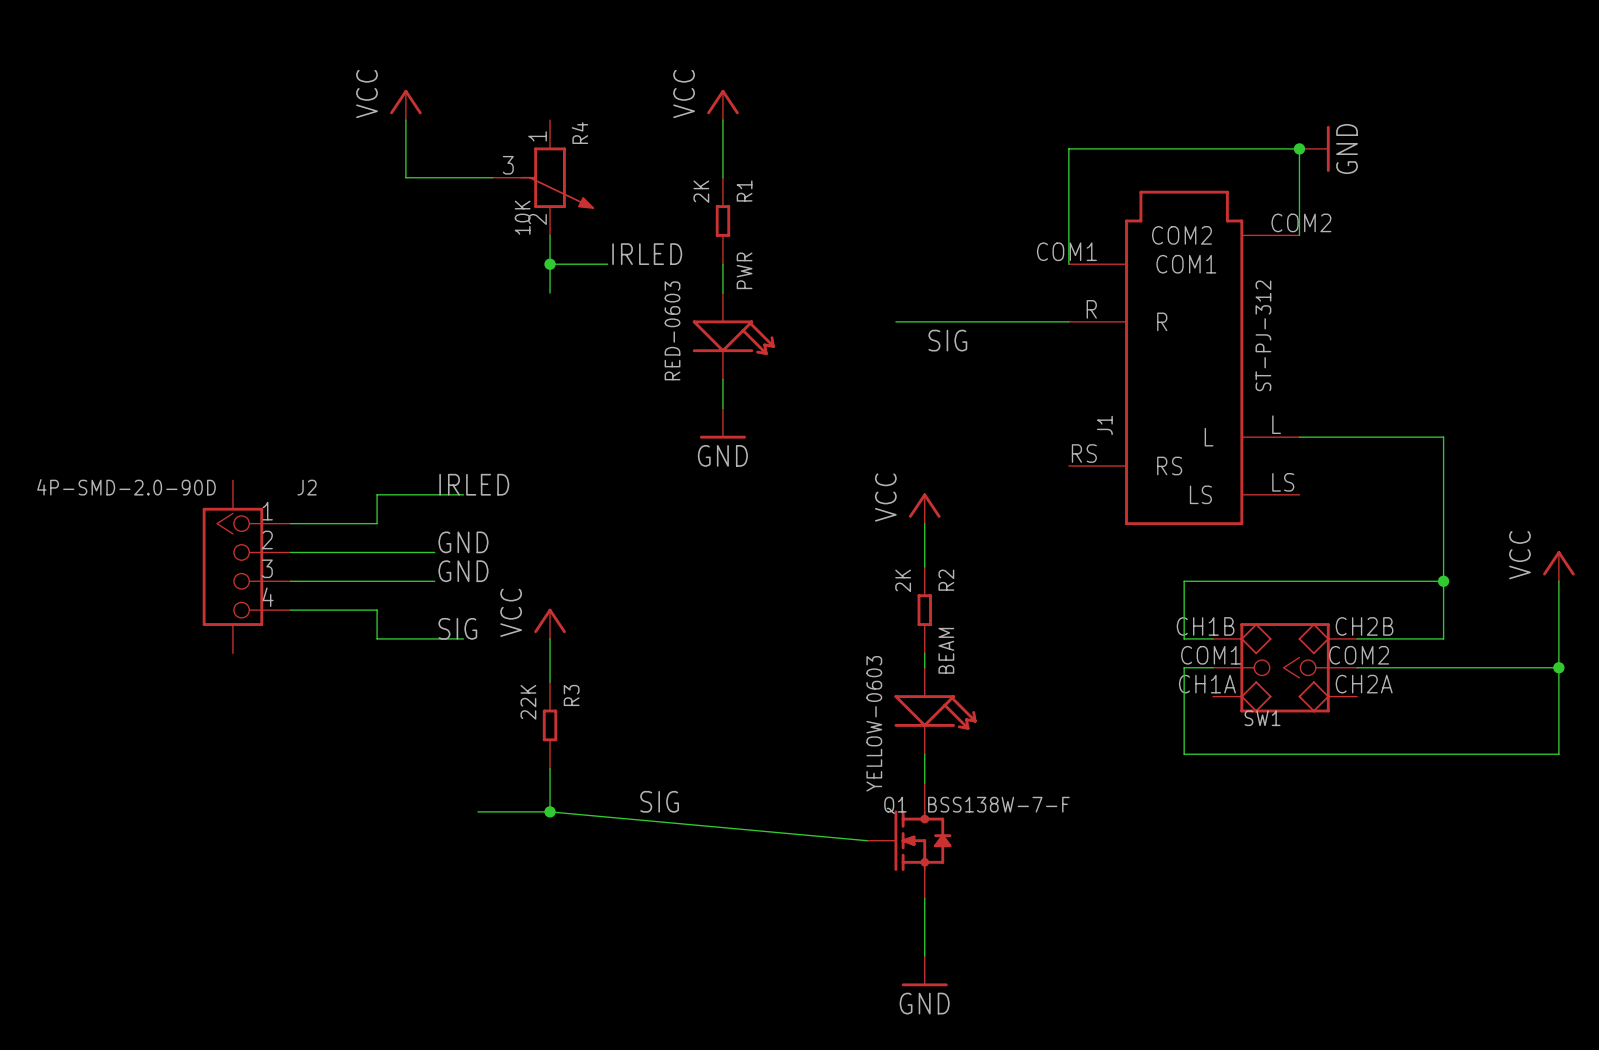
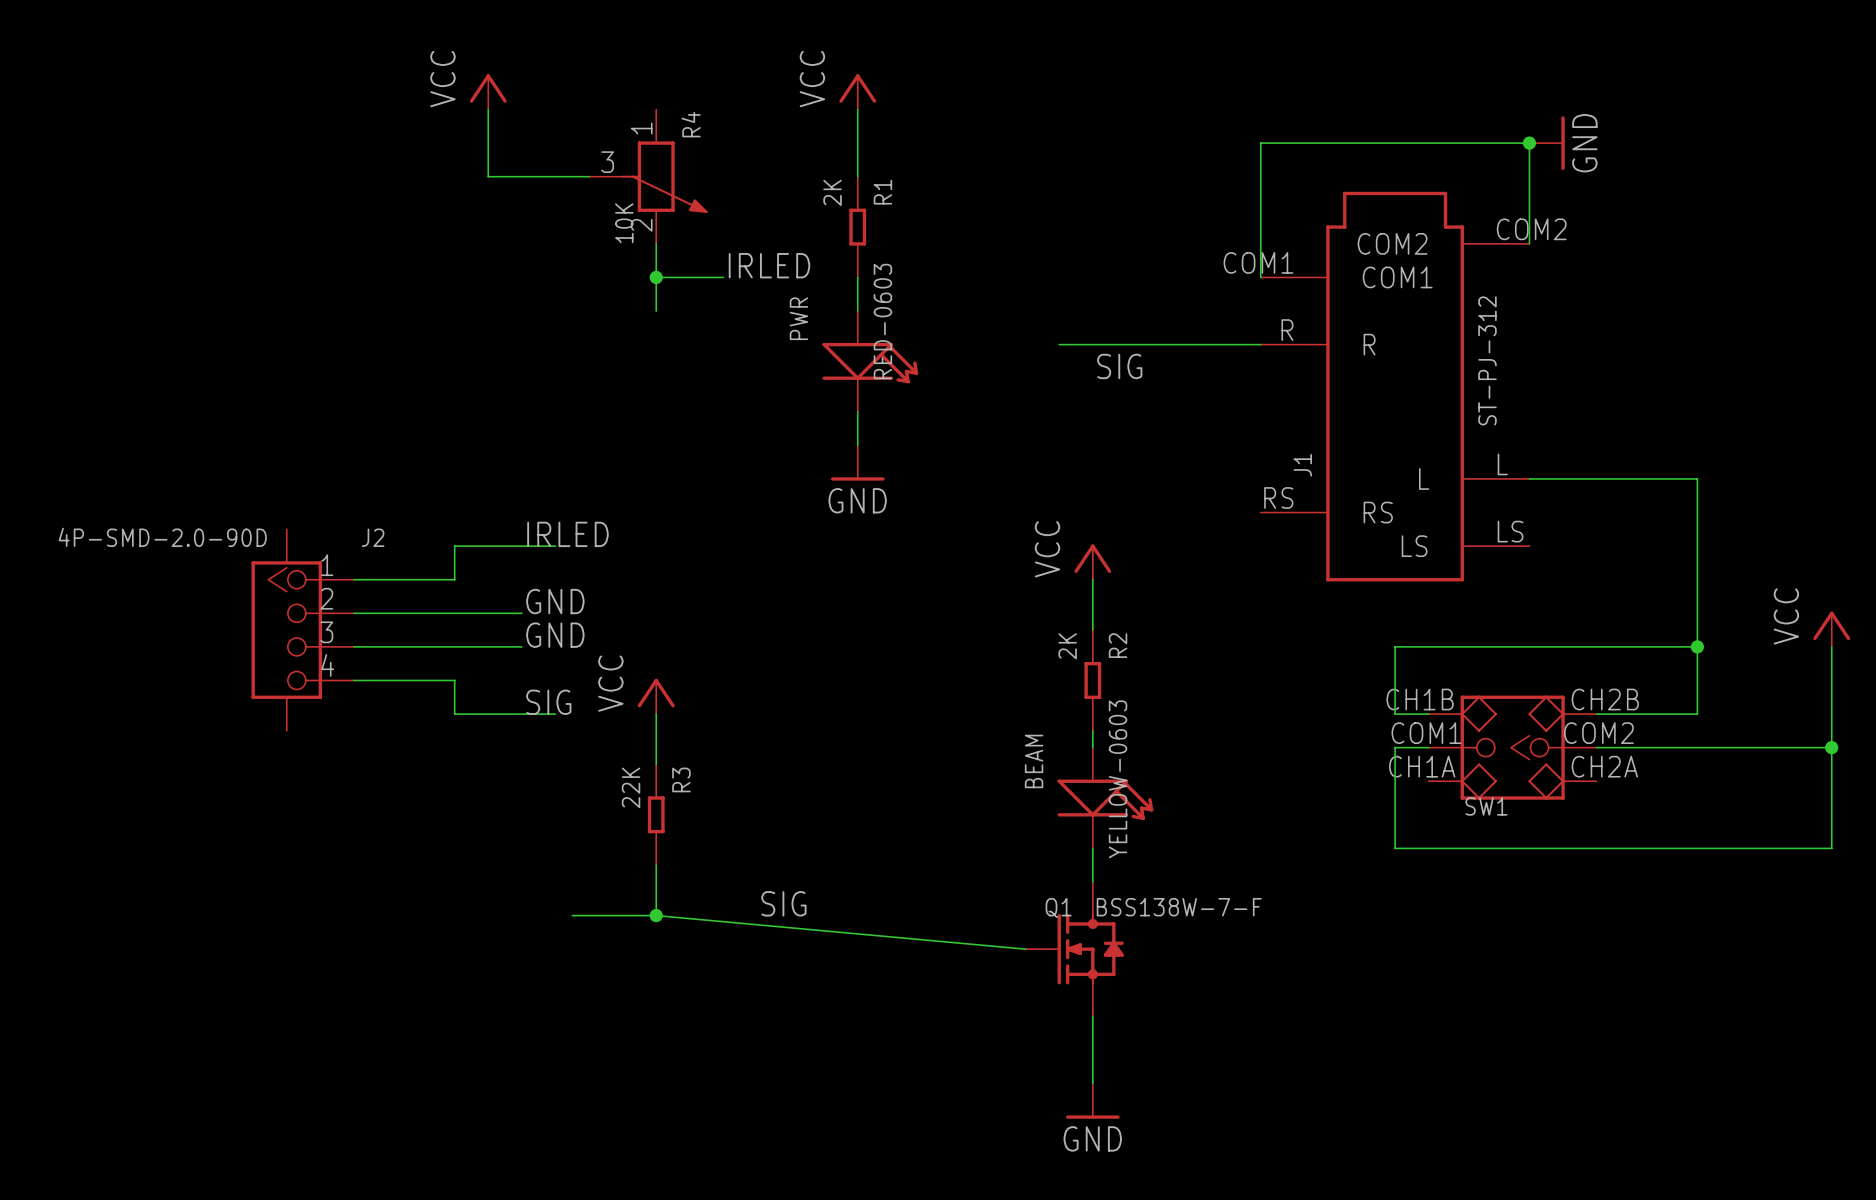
PWR name: PWR (744, 270) -> RED-0603 (882, 321)
PWR value: RED-0603 (672, 330) -> PWR (798, 318)
BEAM name: BEAM (946, 650) -> YELLOW-0603 (1118, 779)
BEAM value: YELLOW-0603 (874, 723) -> BEAM (1034, 761)

